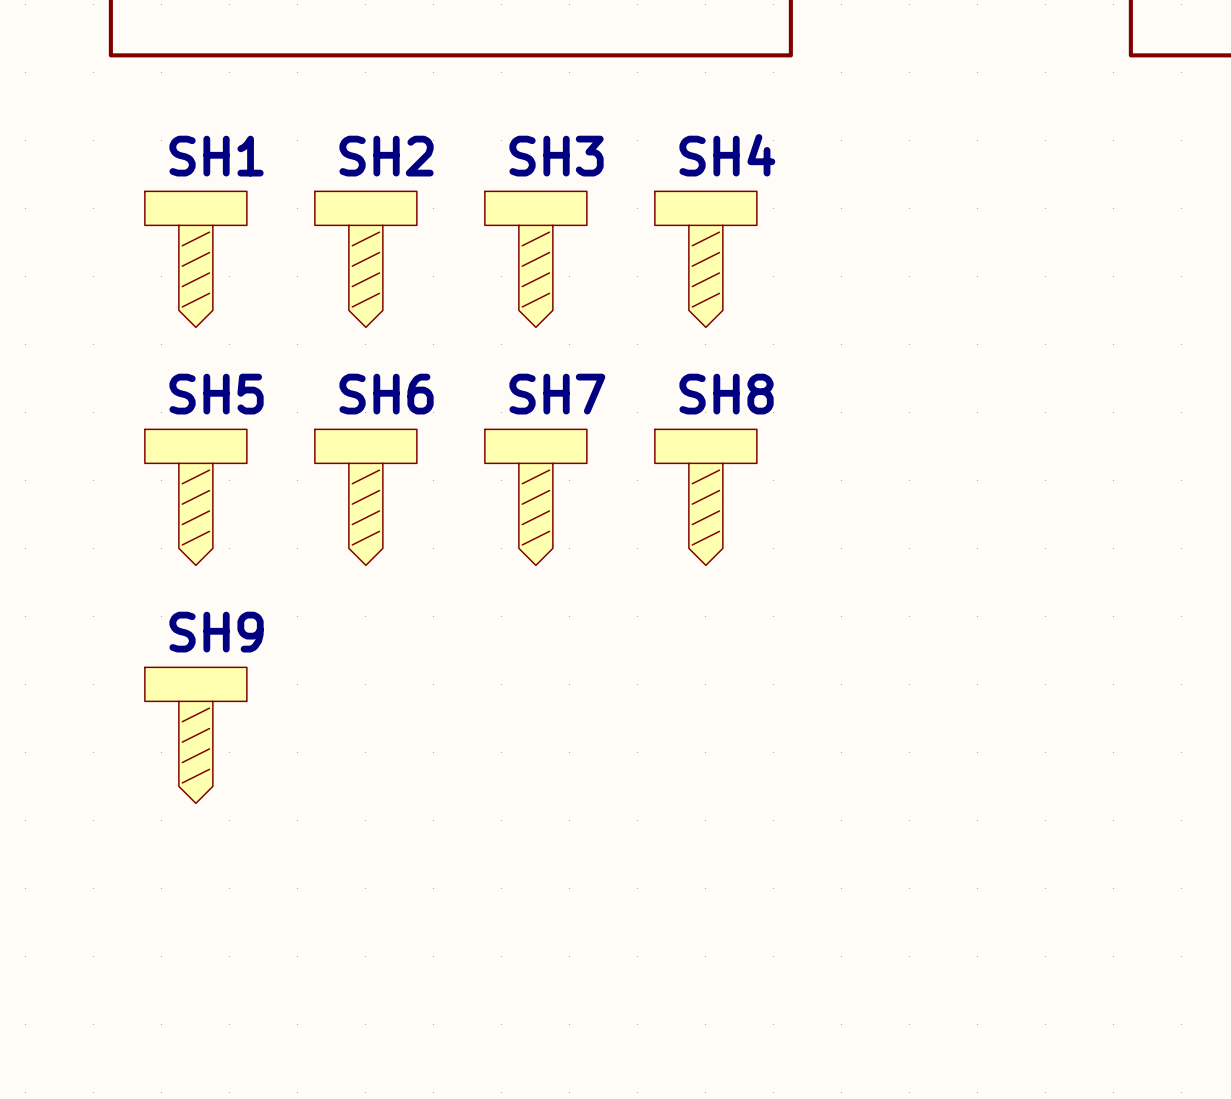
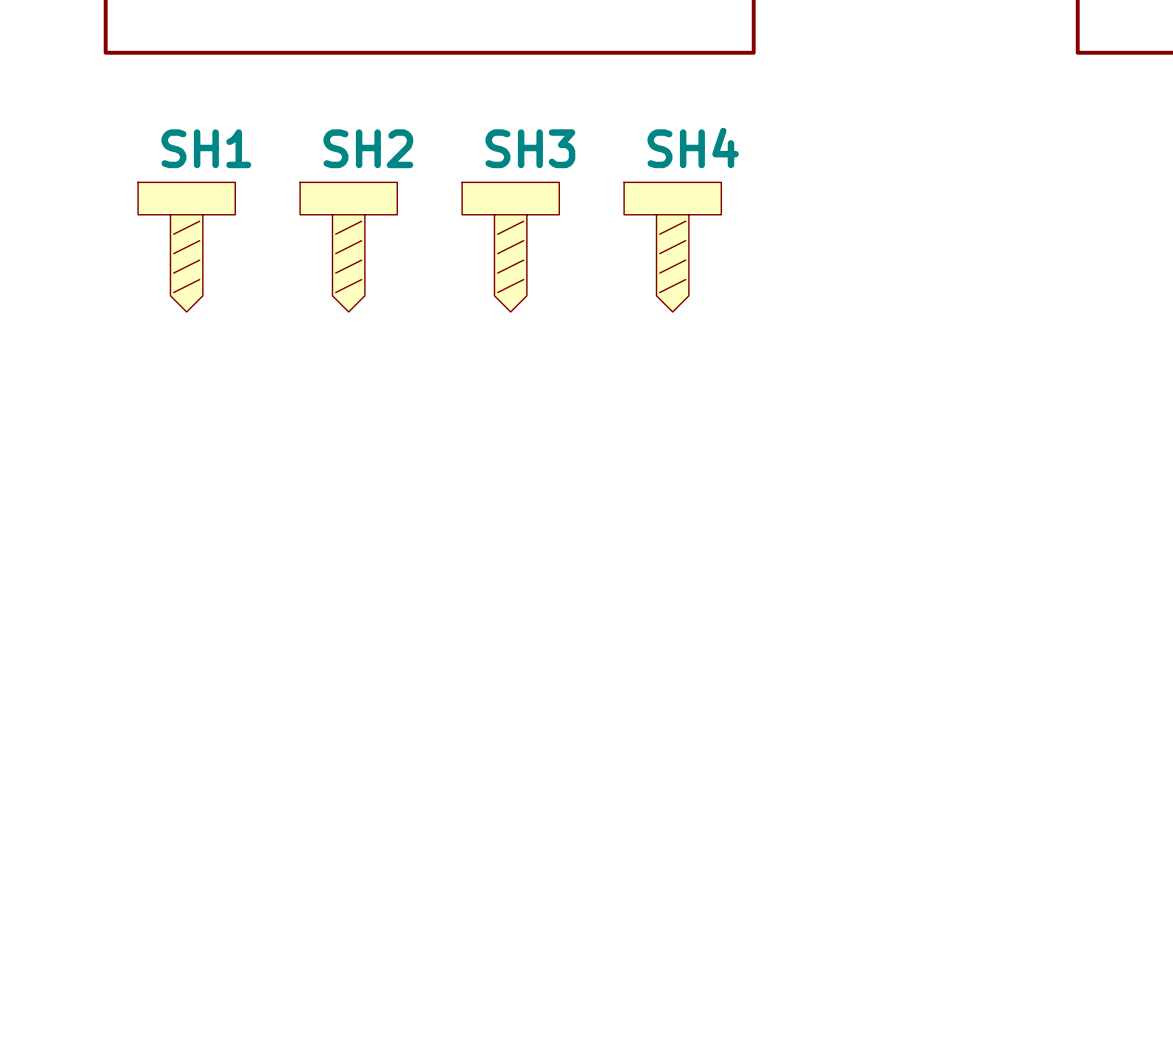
SH5: (195, 497) -> none
SH6: (365, 497) -> none
SH7: (535, 497) -> none
SH8: (705, 497) -> none
SH9: (195, 735) -> none

